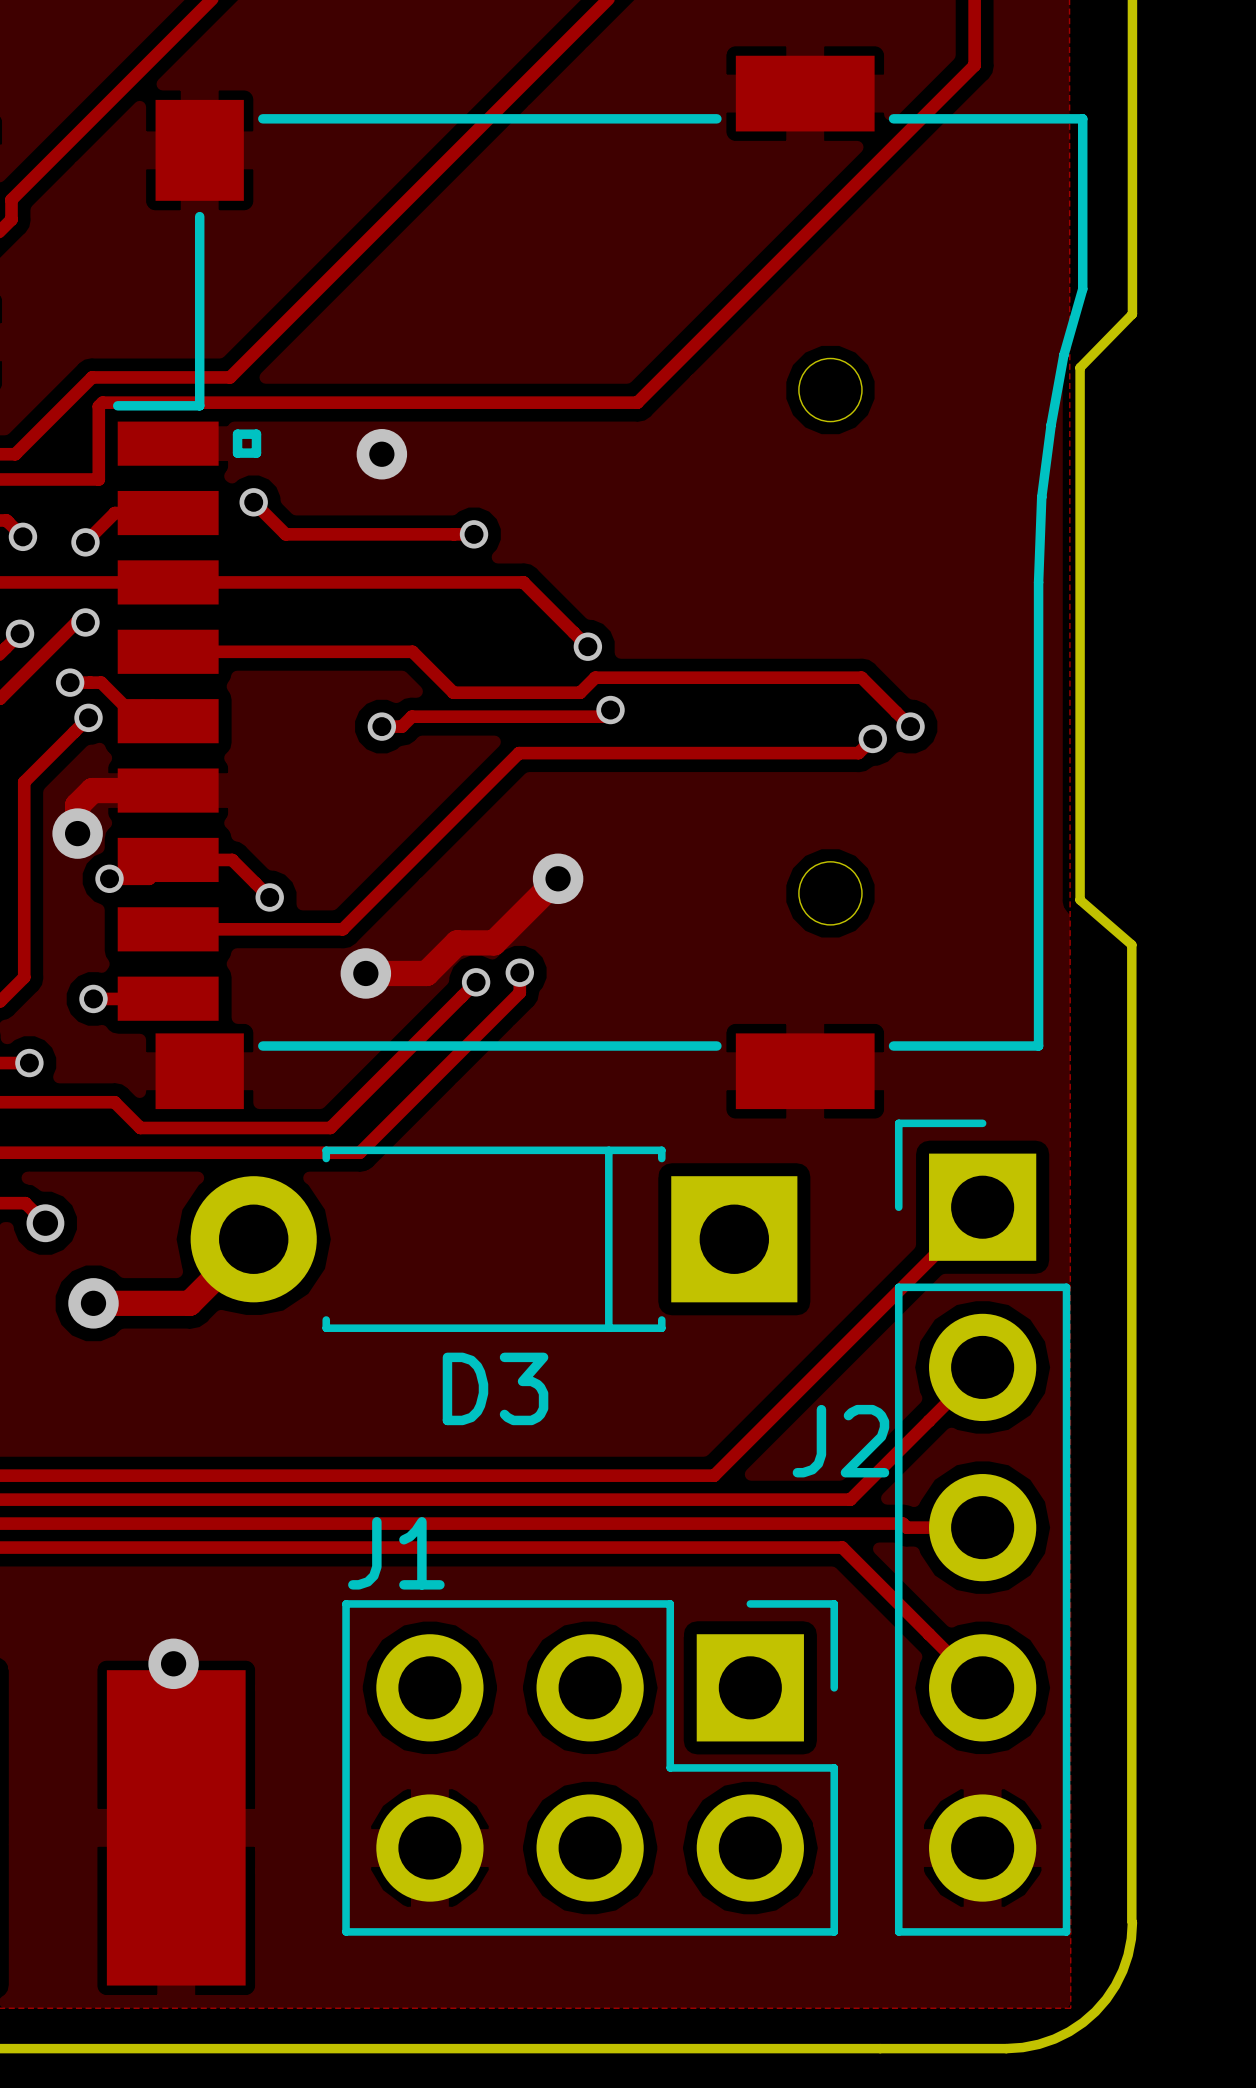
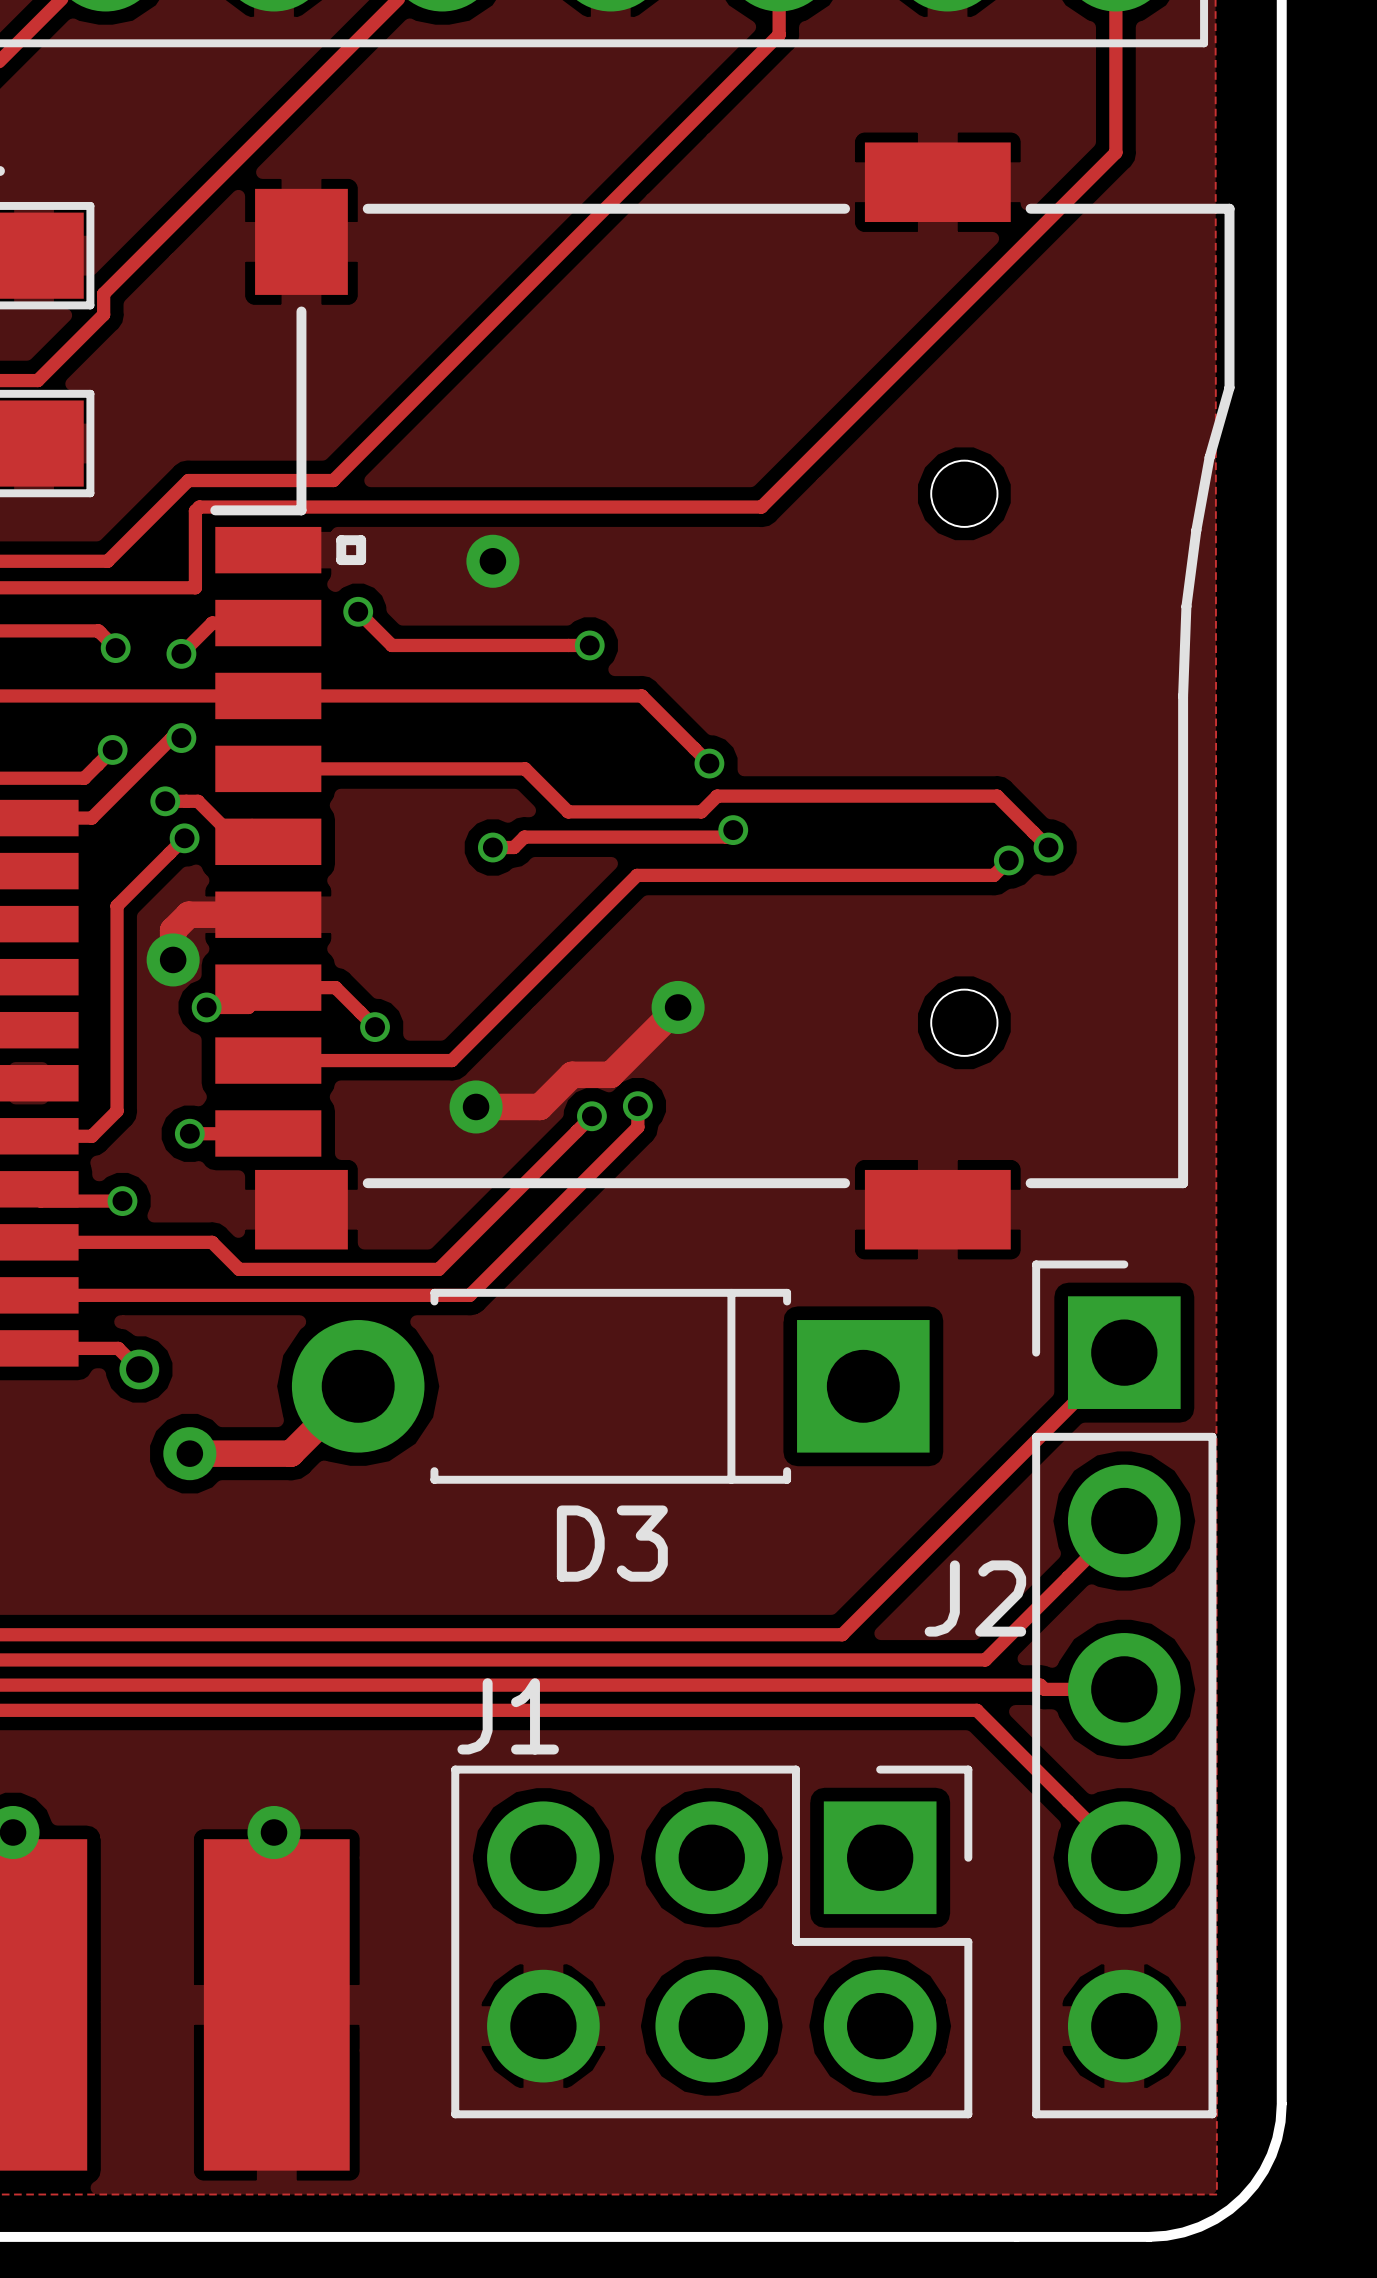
board edge: (1132, 314) (1080, 367) (1080, 900) (1131, 944) (1131, 1921) -> (1281, 413) (1281, 2103)

